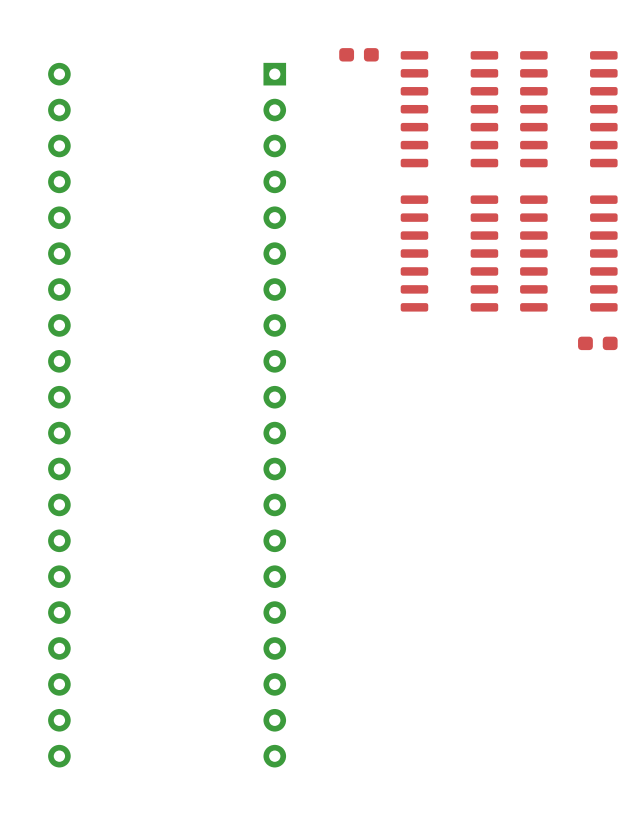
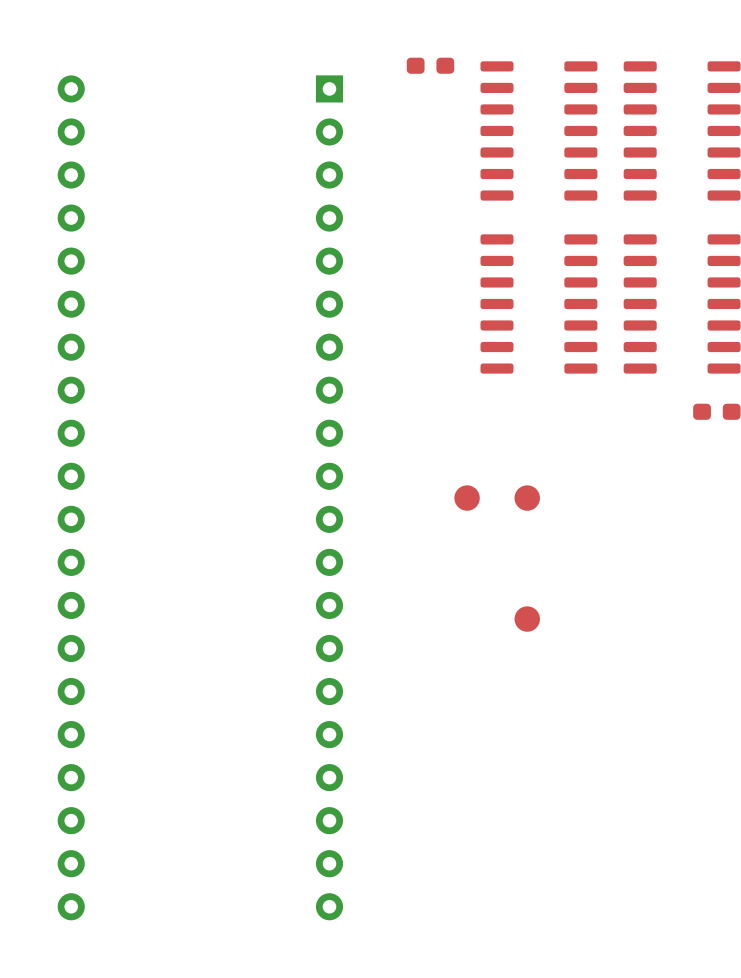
part: none -> (467, 498)
part: none -> (527, 498)
part: none -> (527, 619)

